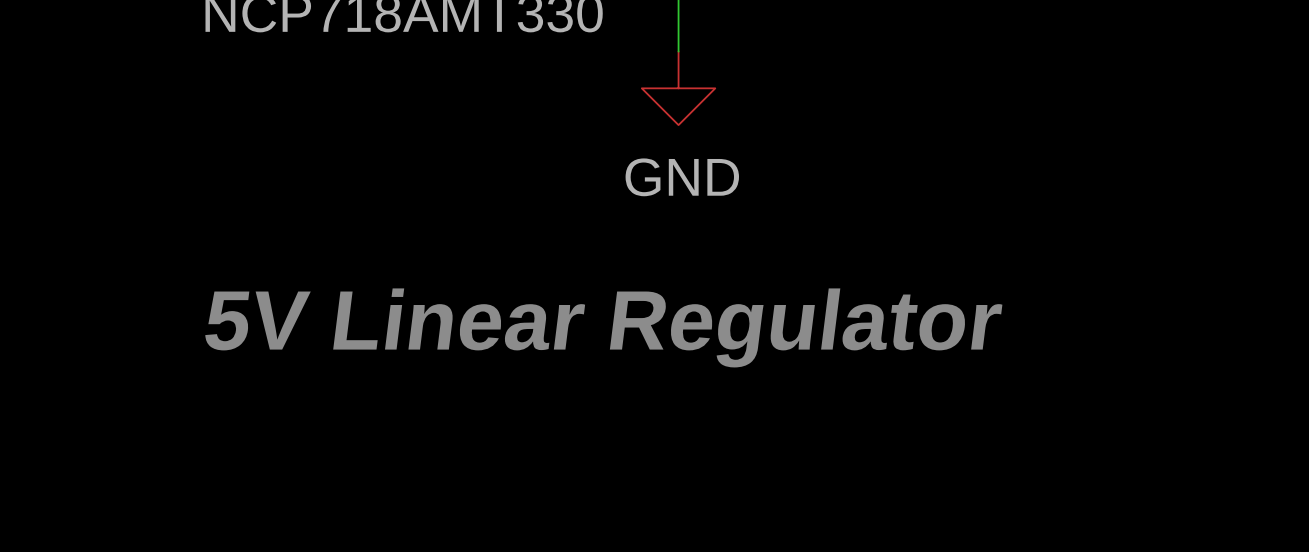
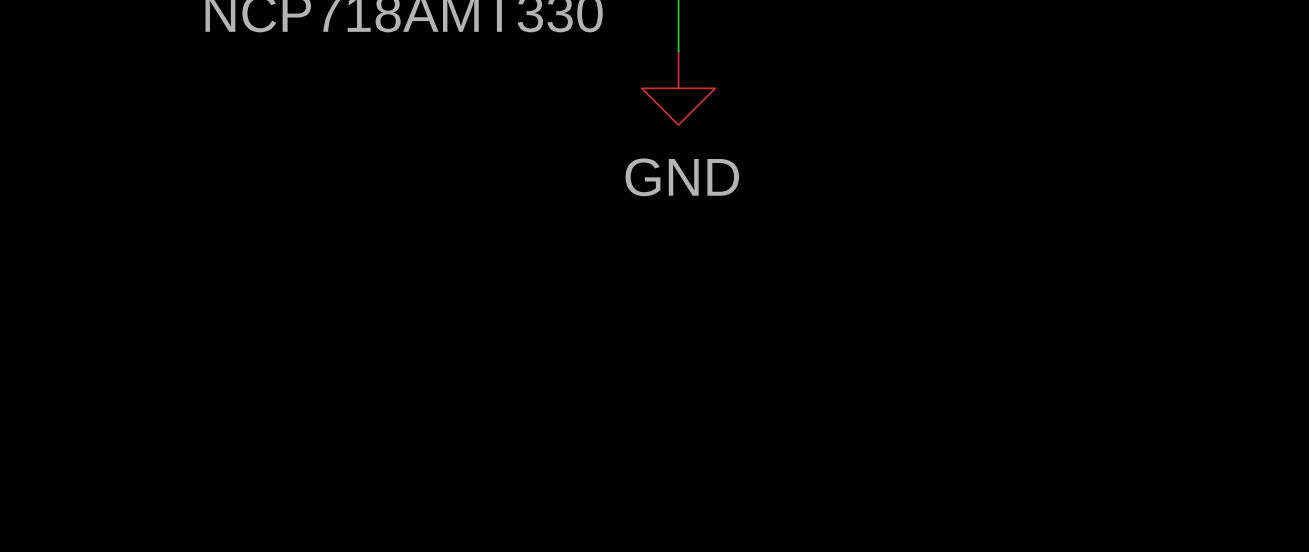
text: 5V Linear Regulator (603, 327) -> none

